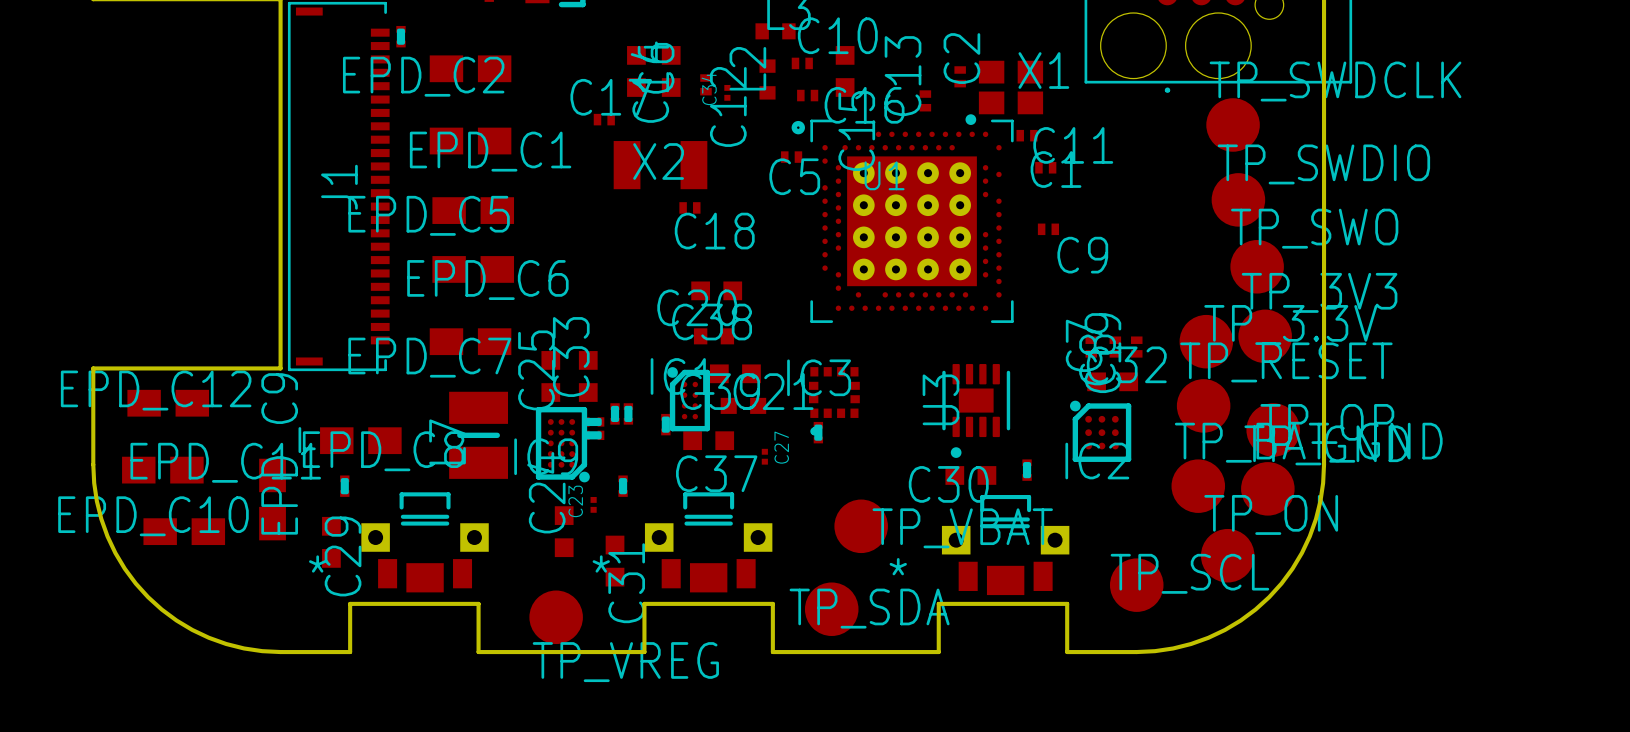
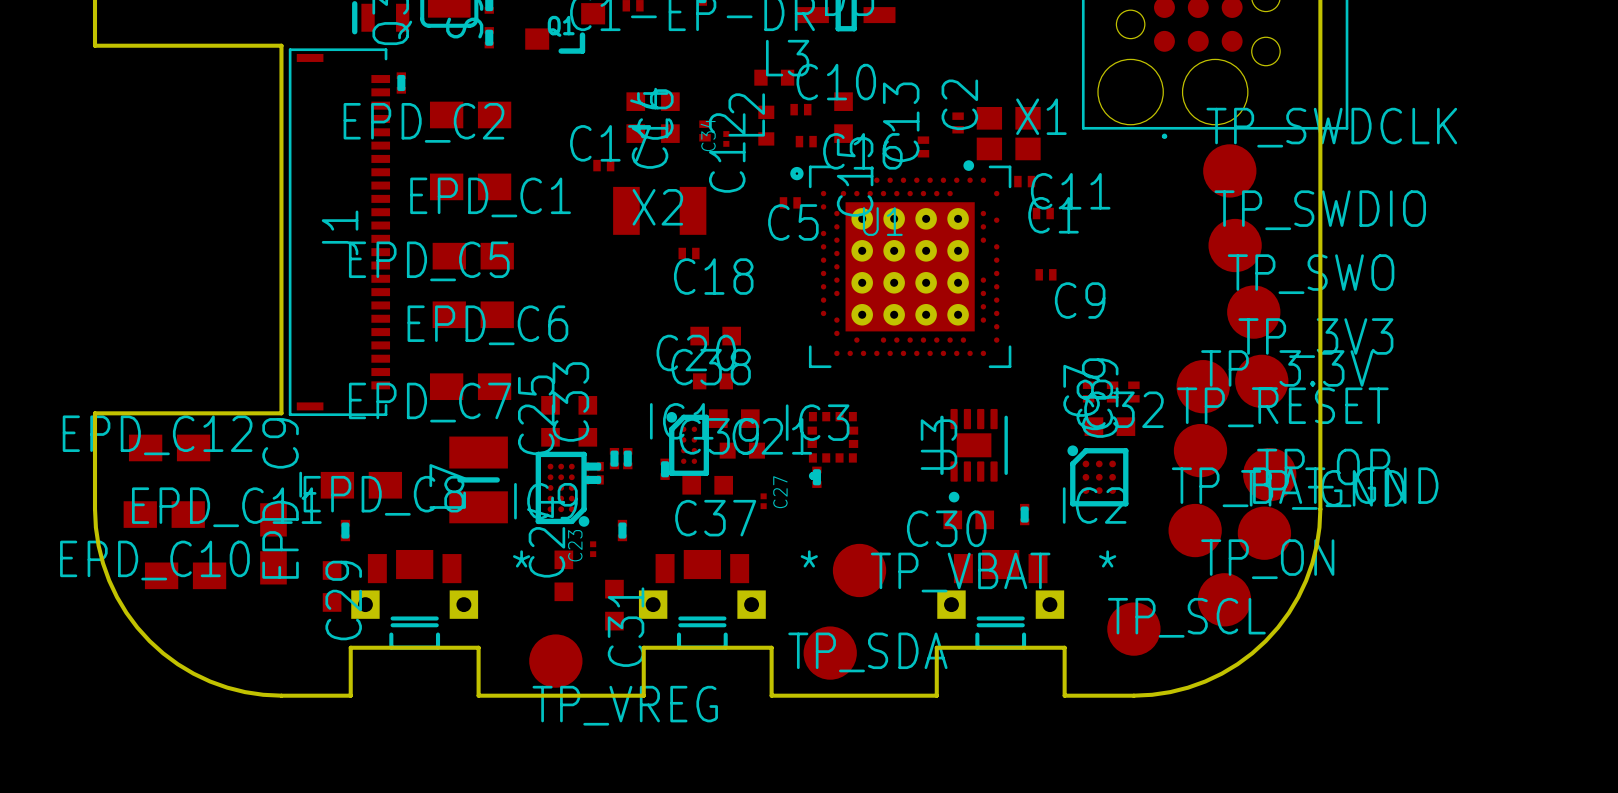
part footprint: [361, 492, 489, 593] -> [351, 549, 479, 650]
part footprint: [644, 492, 773, 593] -> [638, 549, 766, 650]
part footprint: [941, 494, 1070, 596] -> [937, 549, 1065, 650]

